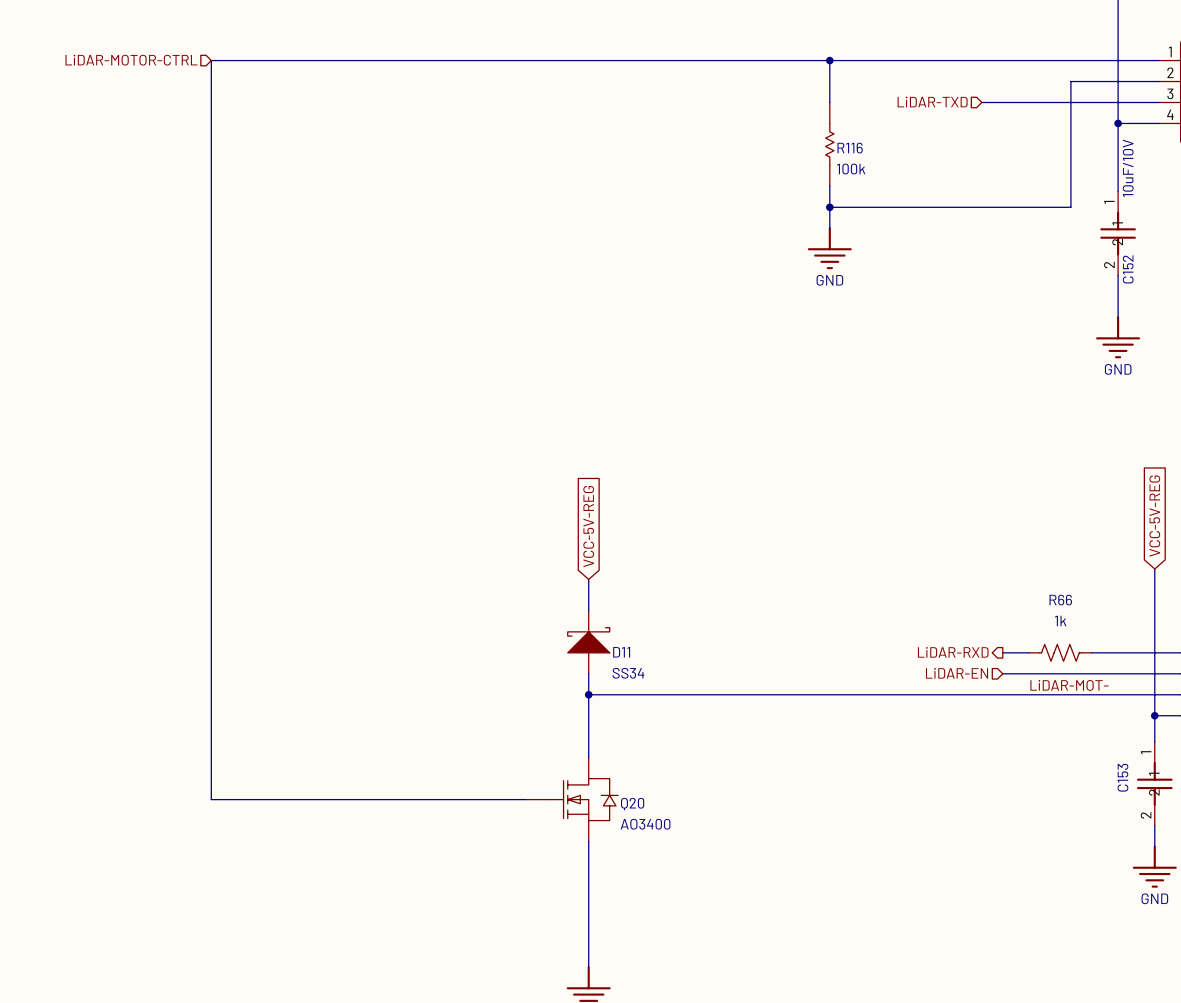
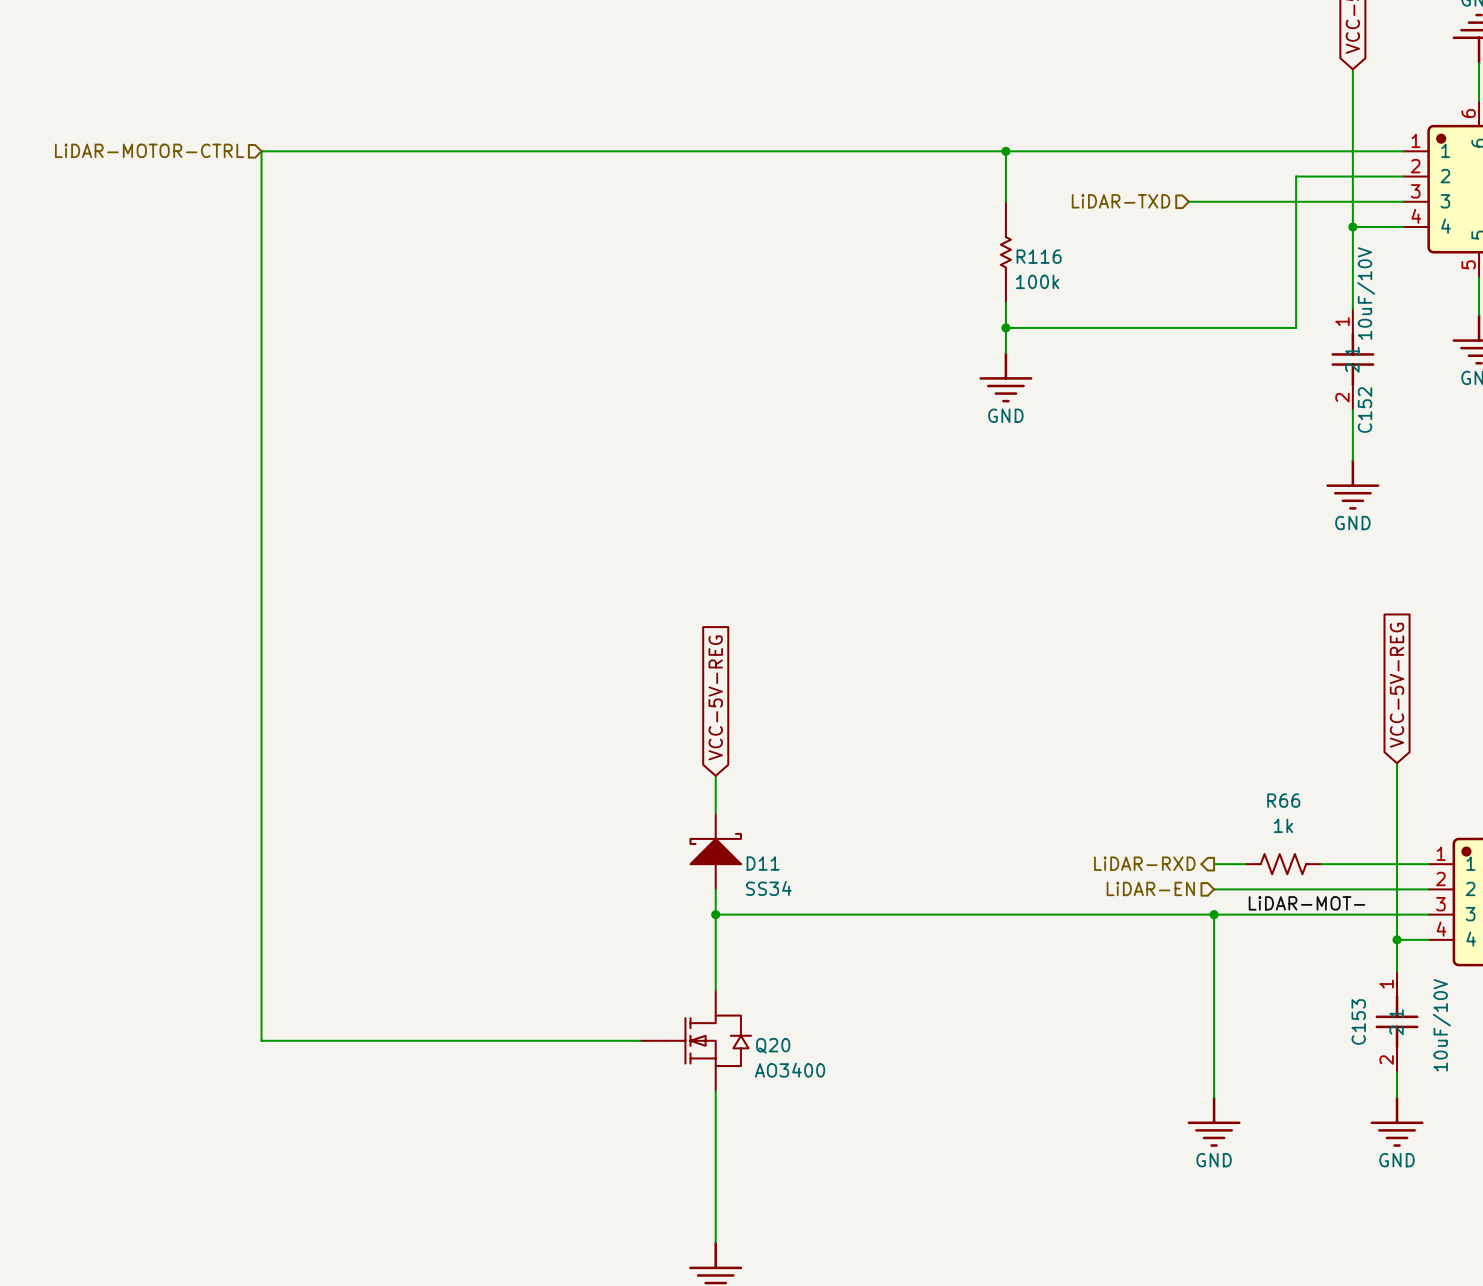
wire: none -> (1214, 914) (1214, 1097)
junction: none -> (1214, 914)
power symbol: none -> GND (1214, 1121)

